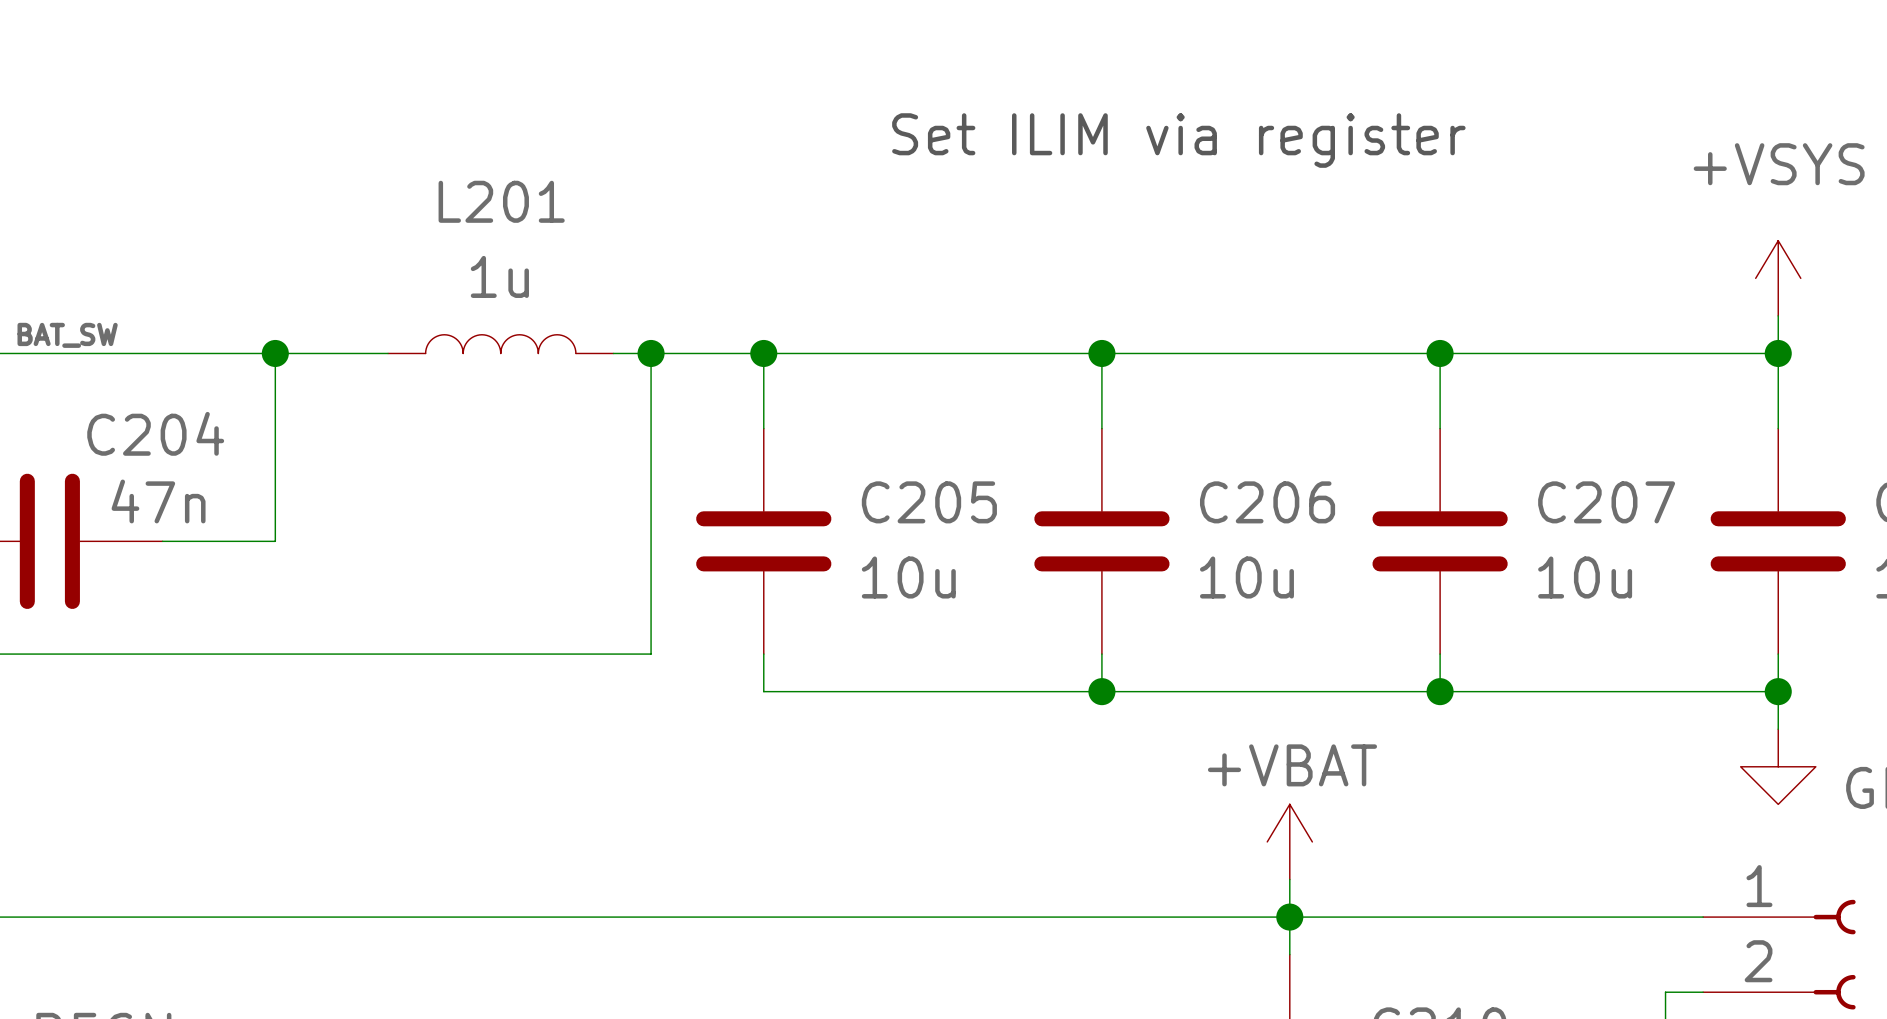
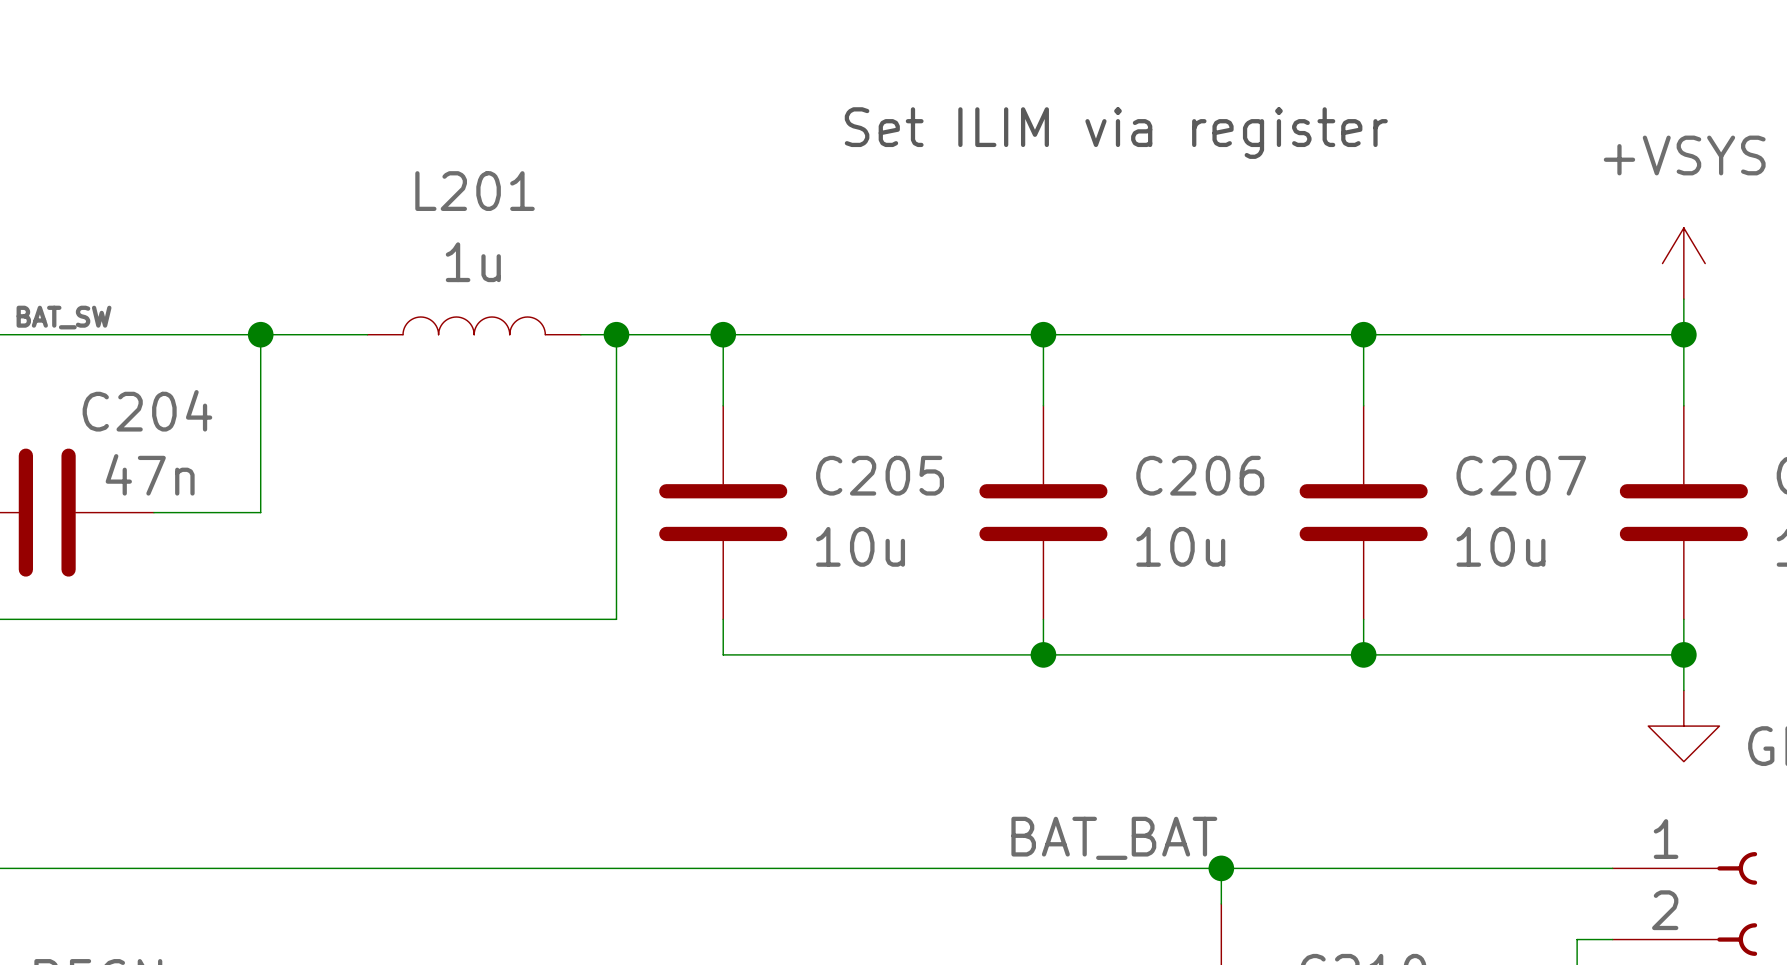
power symbol: +VBAT (1289, 841) -> none
wire: (1289, 879) (1289, 917) -> none
label: none -> BAT_BAT (1114, 838)

